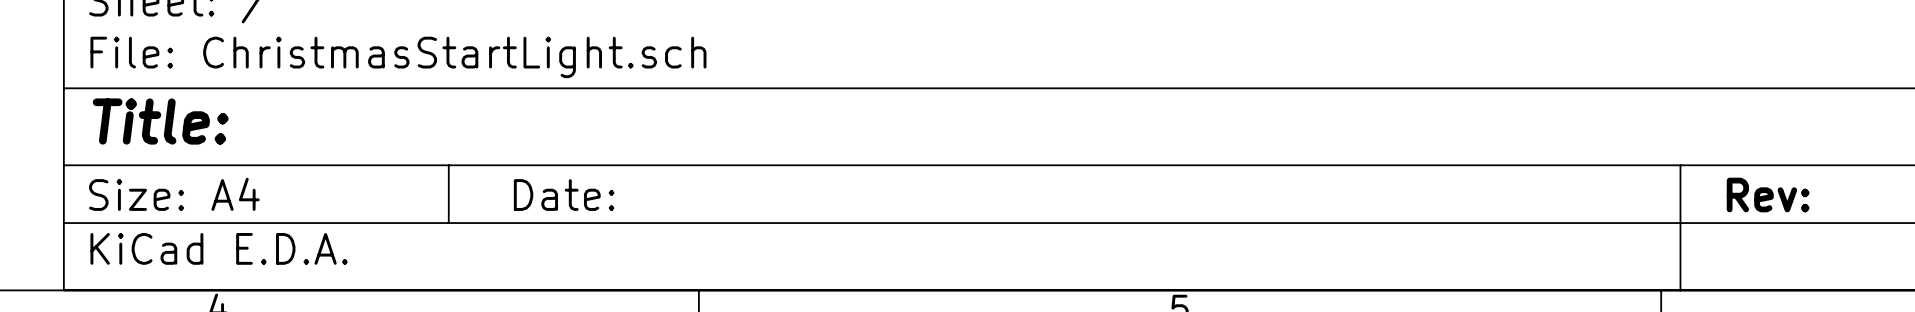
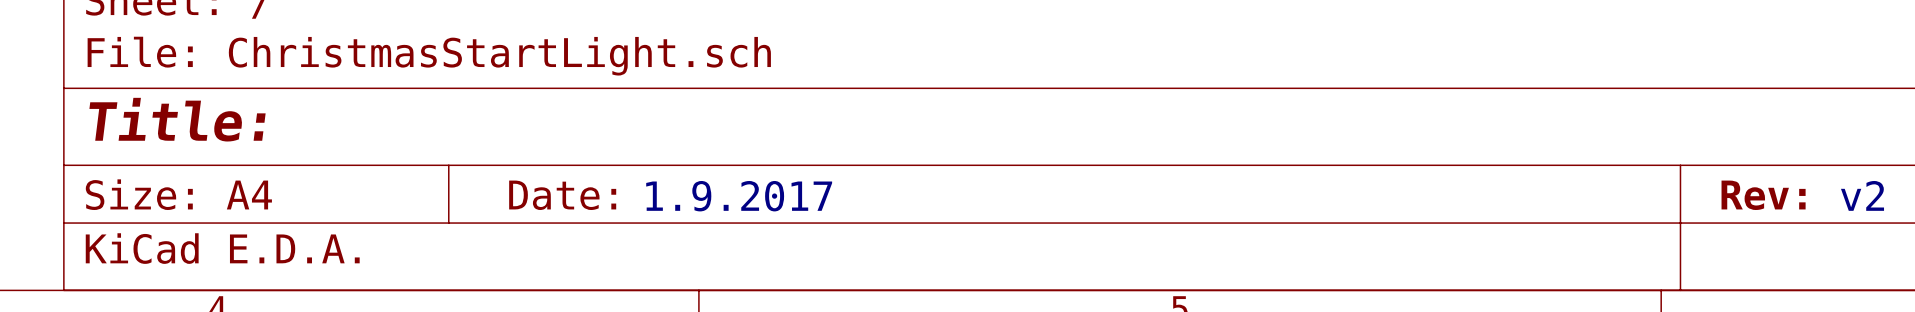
text: none -> 1.9.2017 (739, 196)
text: none -> v2 (1862, 195)

